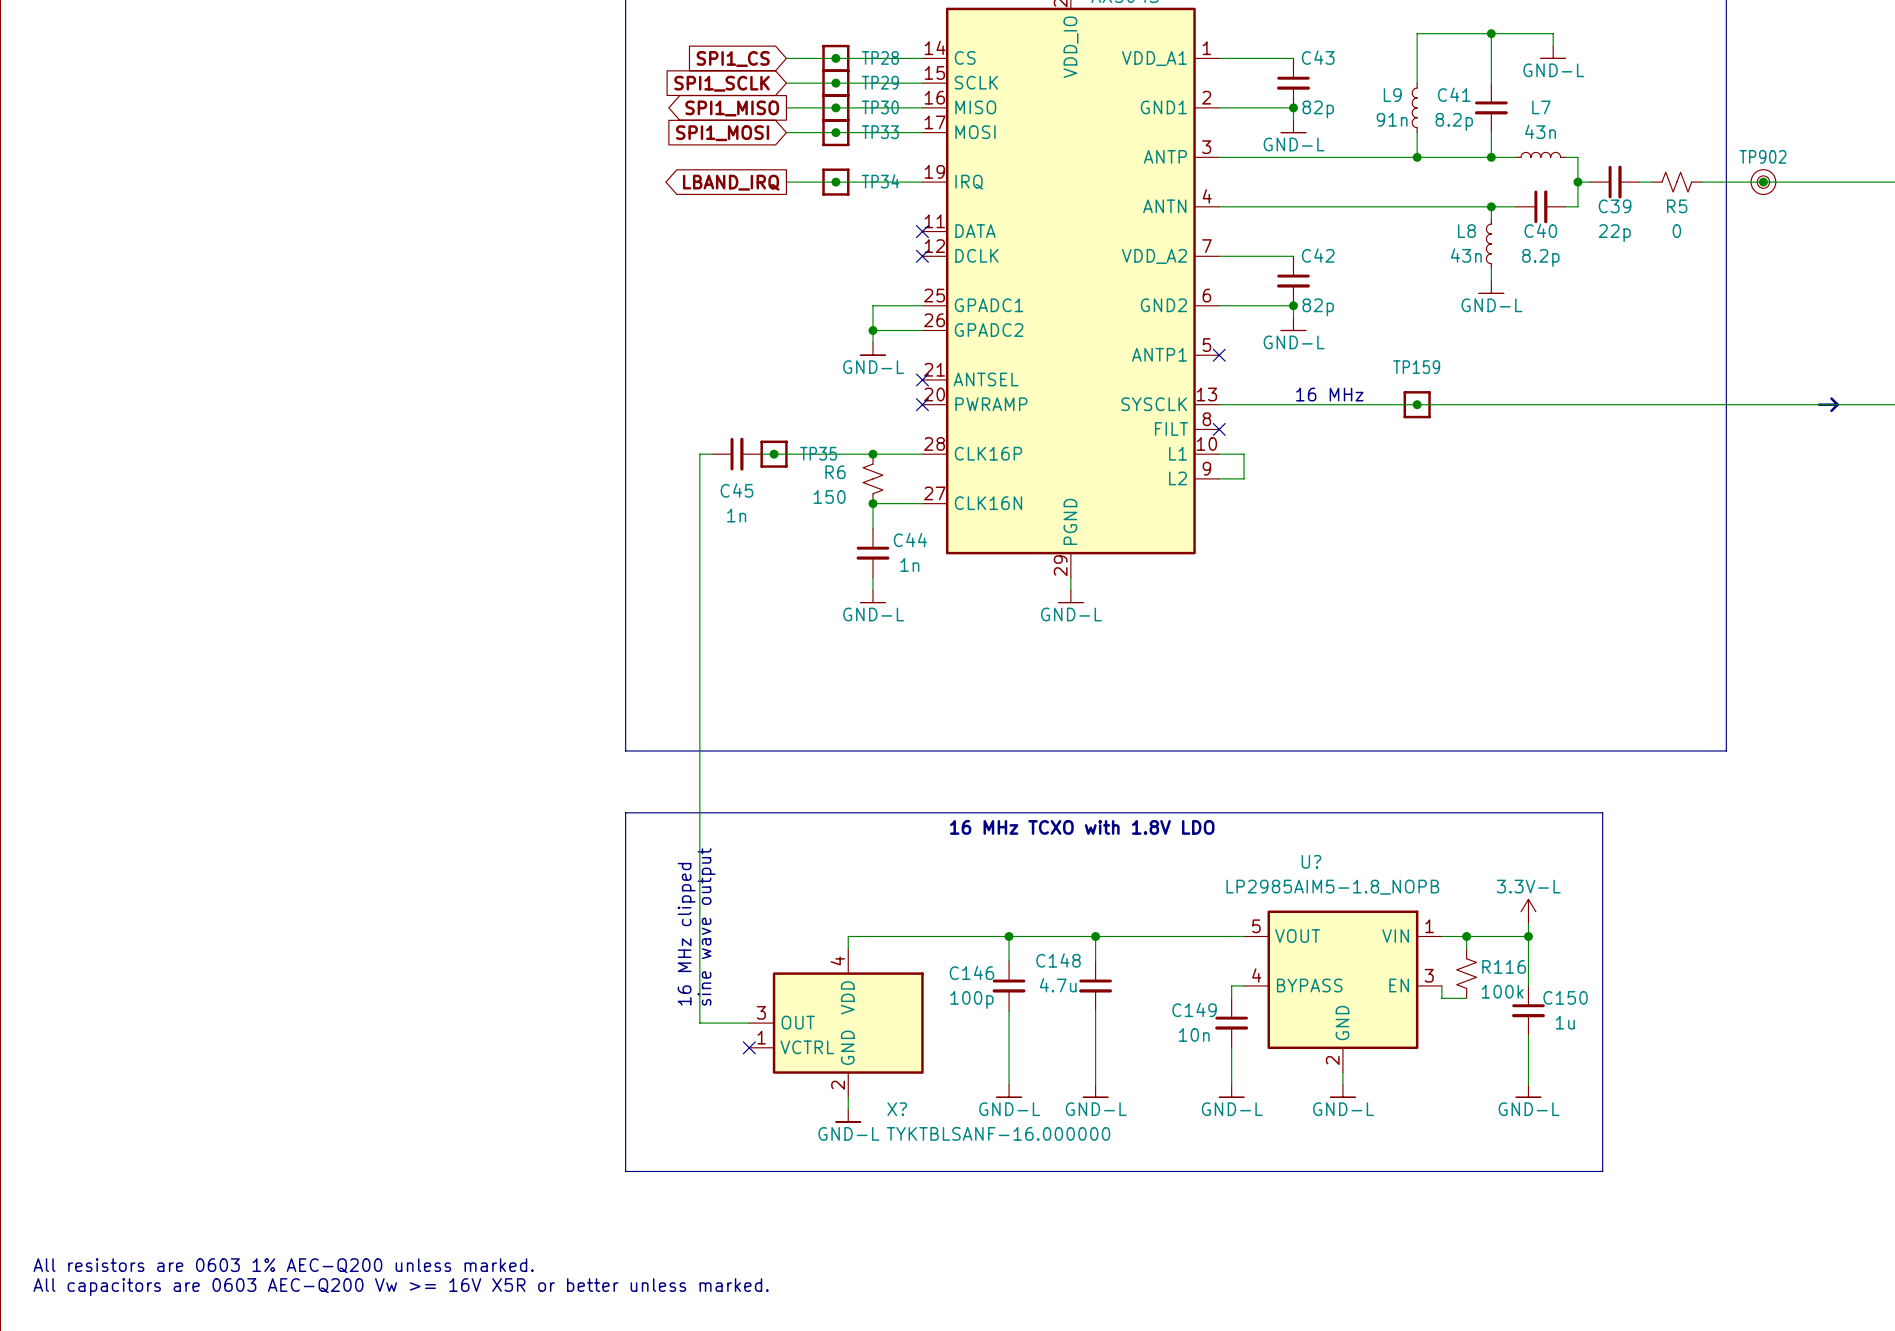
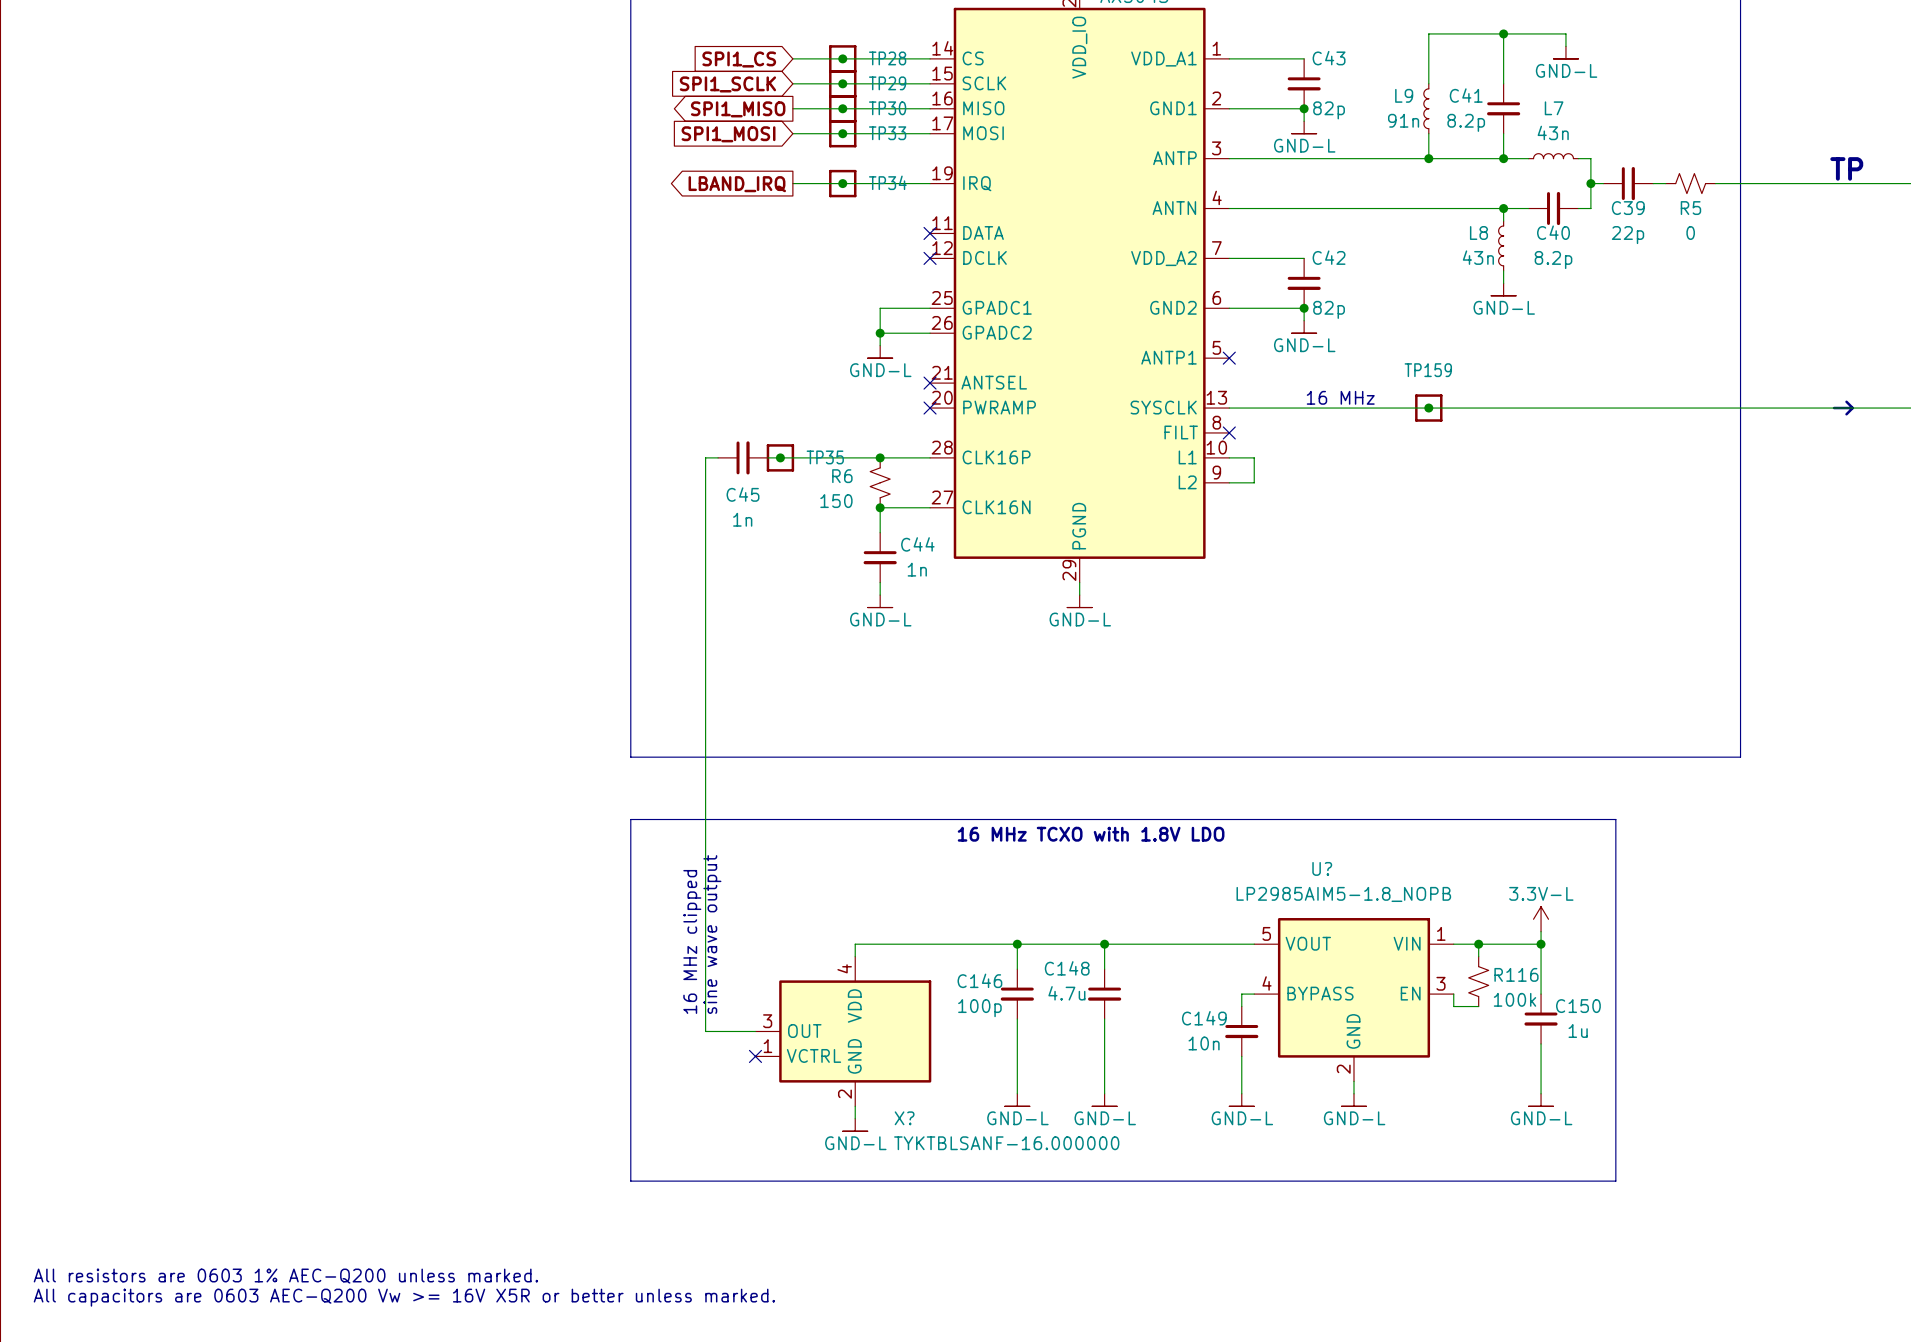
text: none -> TP (1846, 168)
junction: (1763, 182) -> none
TP902: (1763, 182) -> none

